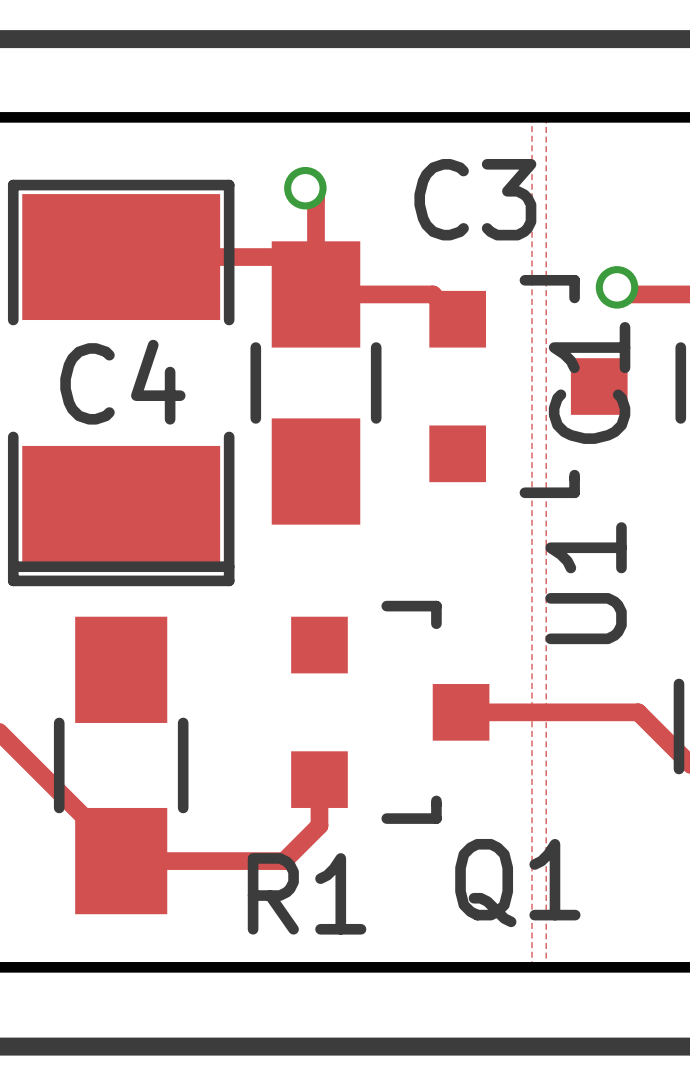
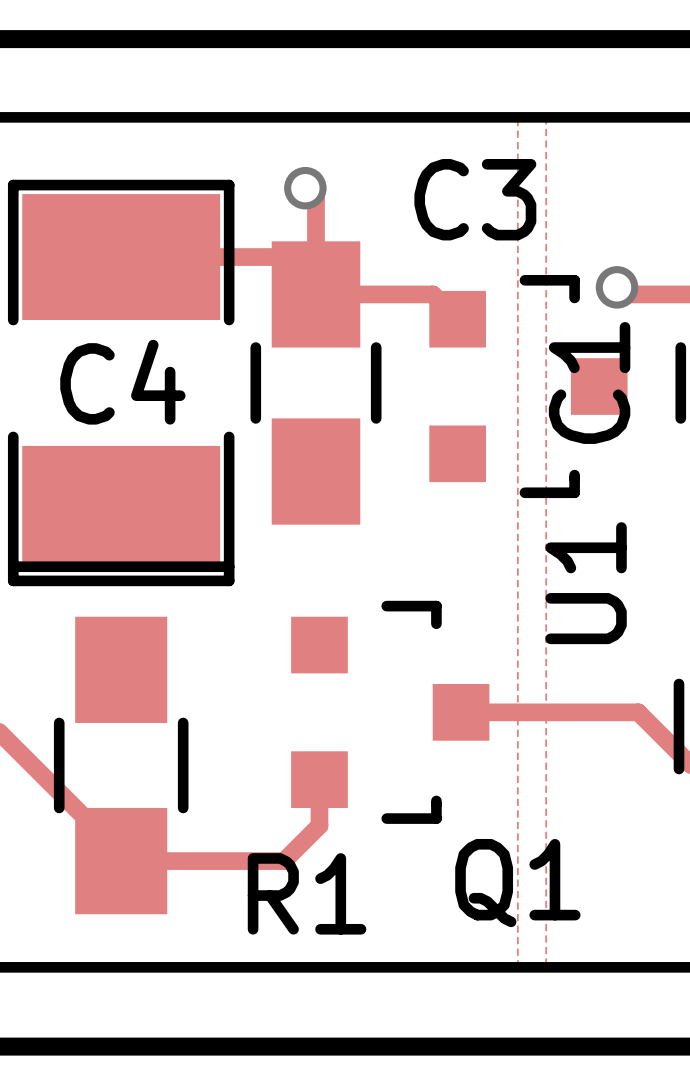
top zone outline: (517, 117) (532, 117) (532, 967) (517, 967) -> (517, 117) (517, 967)

